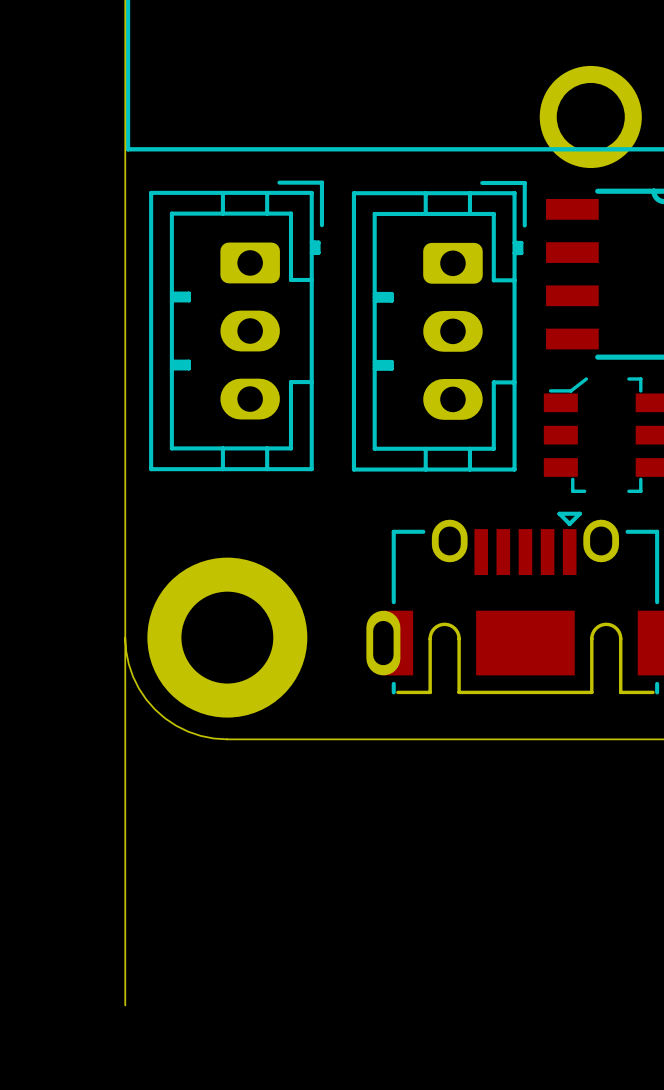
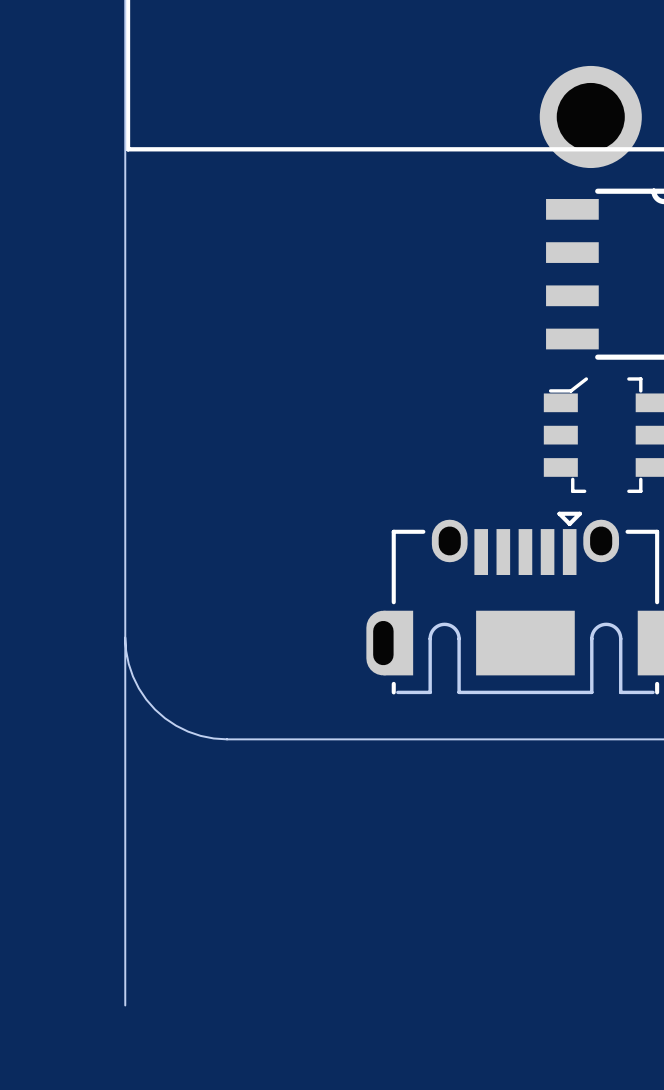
part: (236, 325) -> none
part: (439, 326) -> none
part: (227, 637) -> none

